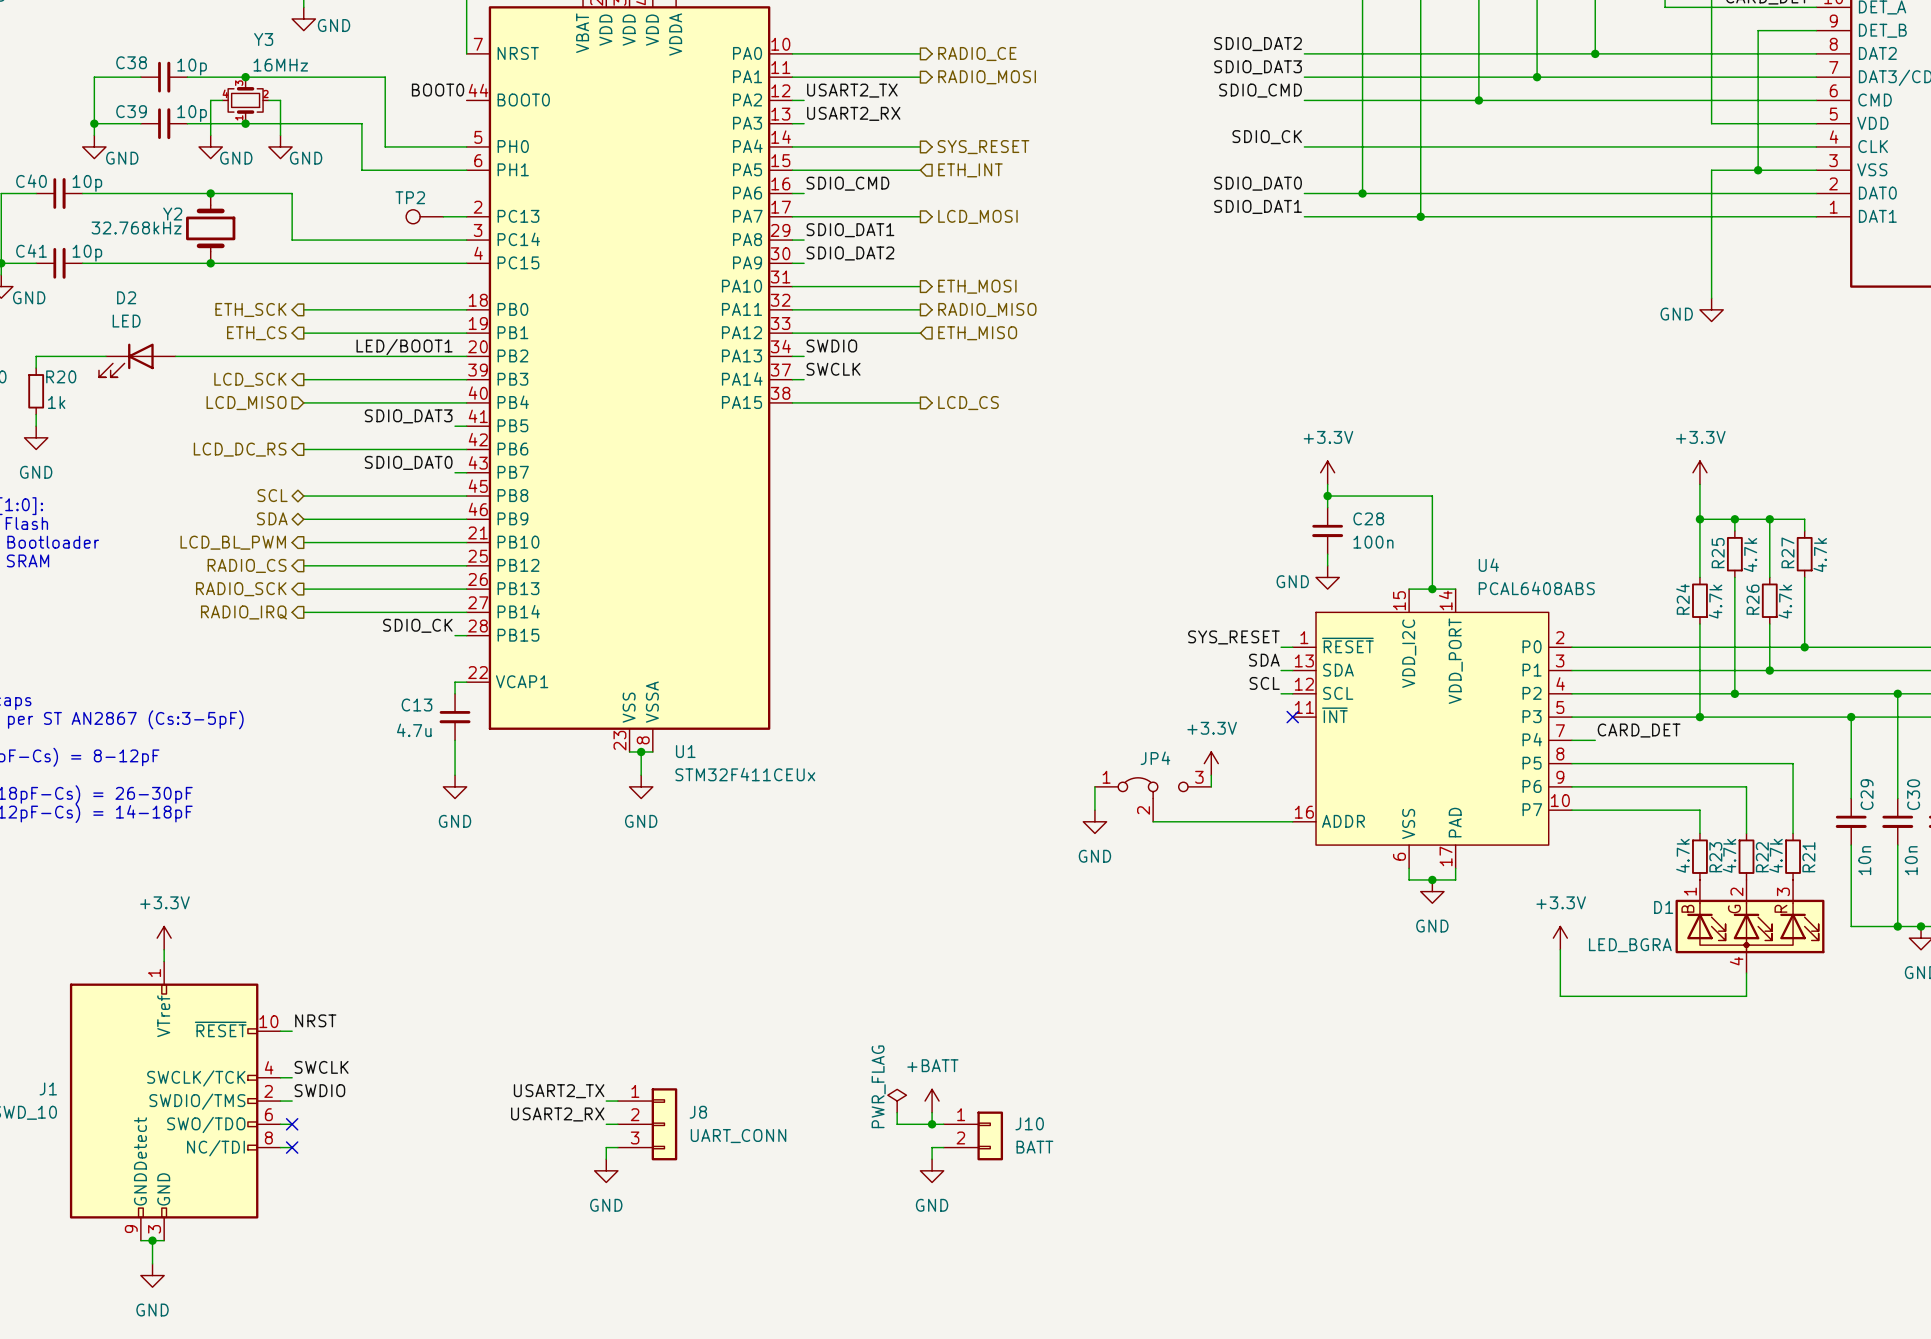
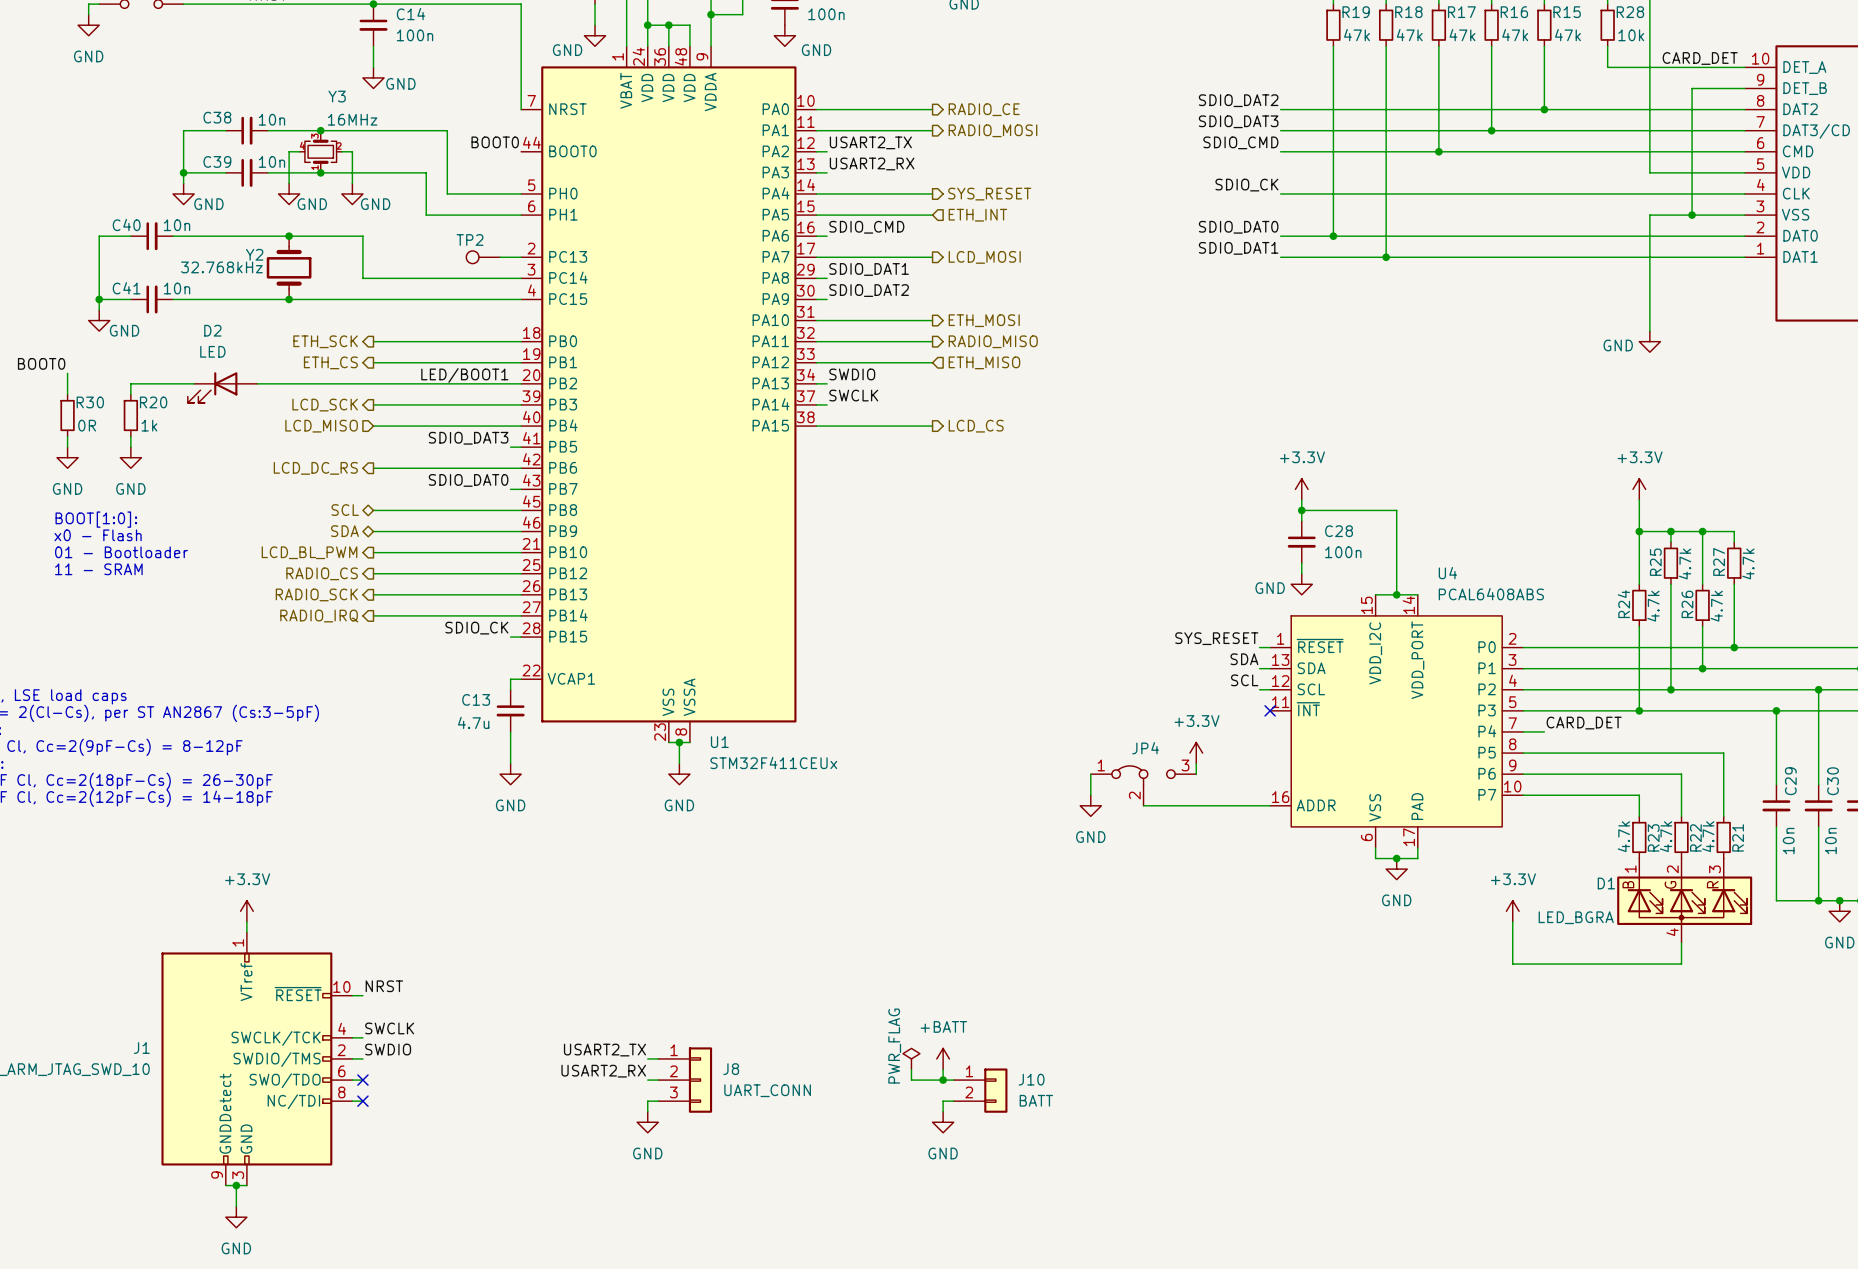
C38 value: 10p (192, 67) -> 10n (271, 119)
C39 value: 10p (192, 113) -> 10n (271, 161)
C40 value: 10p (87, 183) -> 10n (177, 225)
C41 value: 10p (87, 253) -> 10n (177, 288)

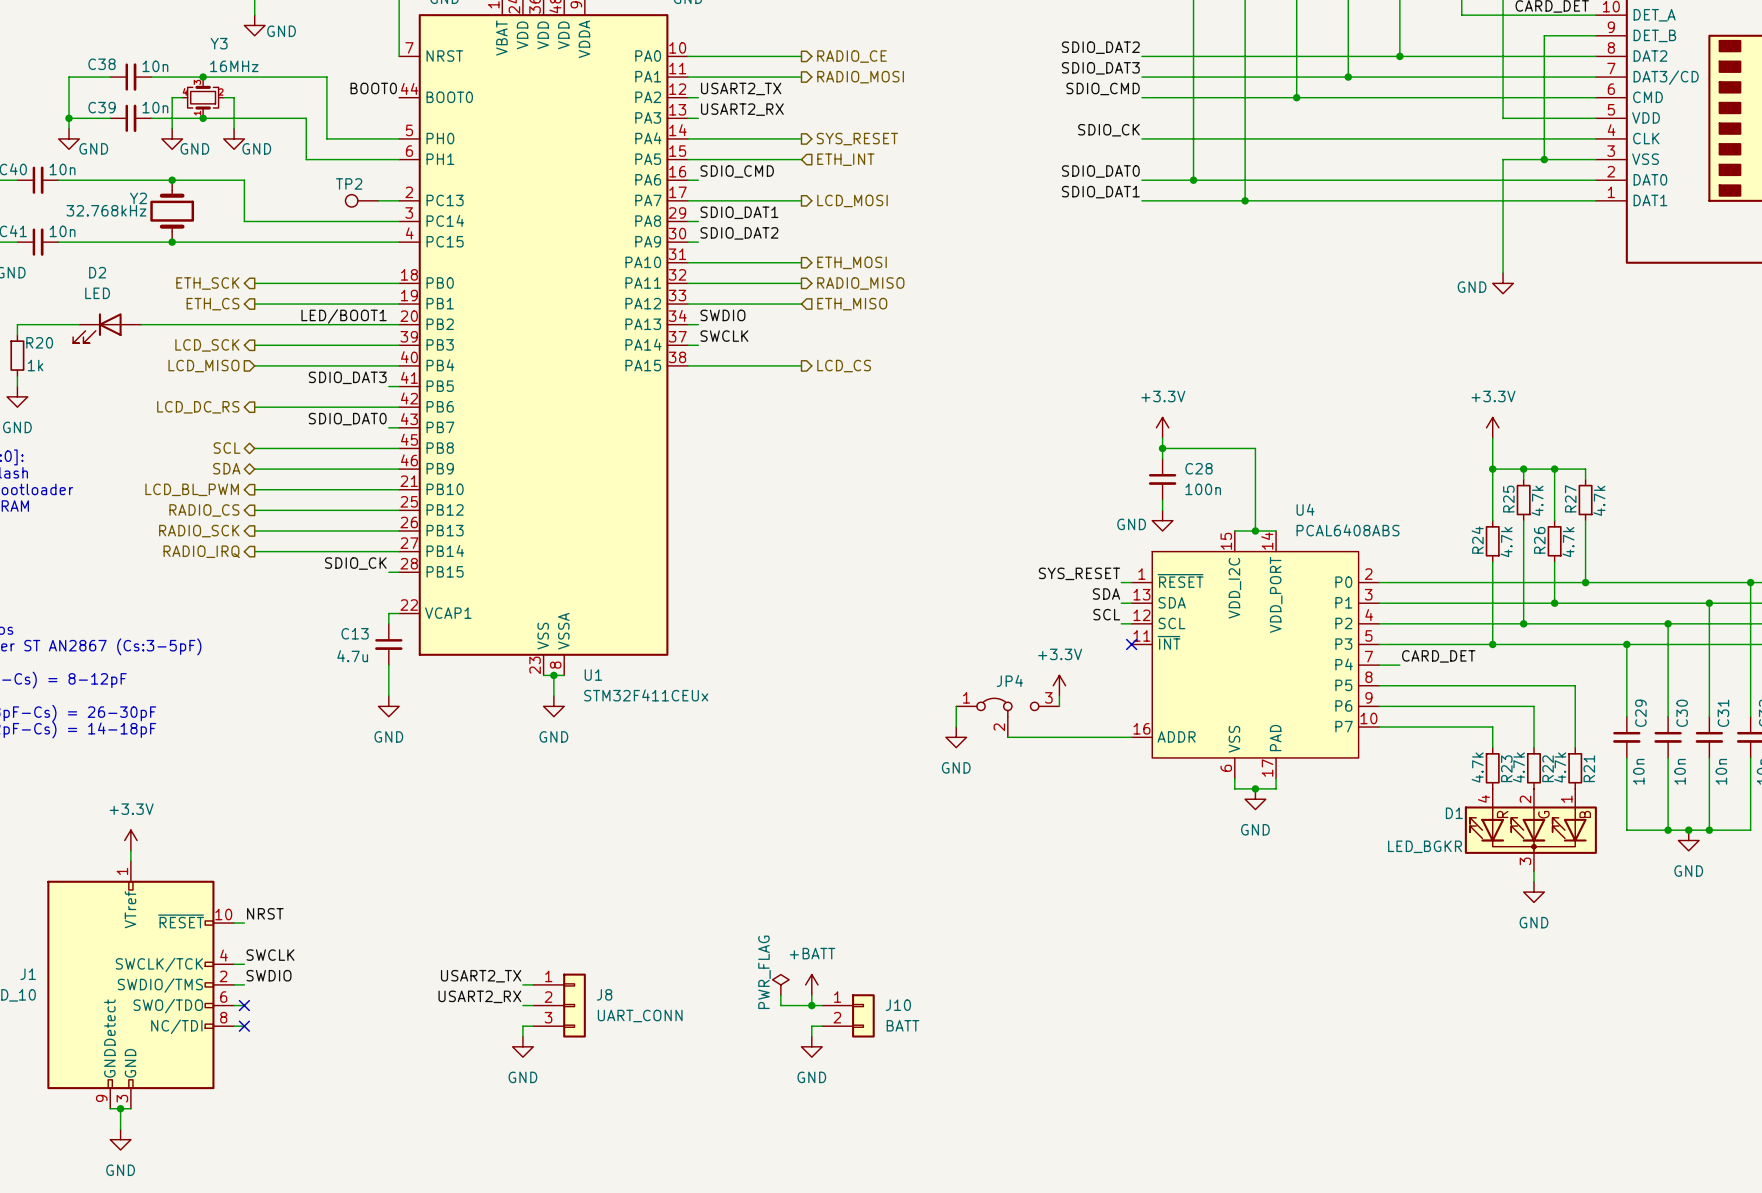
D1 symbol: [1617, 858, 1753, 943] -> [1464, 788, 1597, 872]
power symbol: +3.3V (1512, 911) -> none
D1 value: LED_BGRA (1576, 917) -> LED_BGKR (1425, 846)
wire: (1512, 921) (1512, 964) (1681, 964) (1681, 953) -> none
power symbol: none -> GND (1533, 892)

